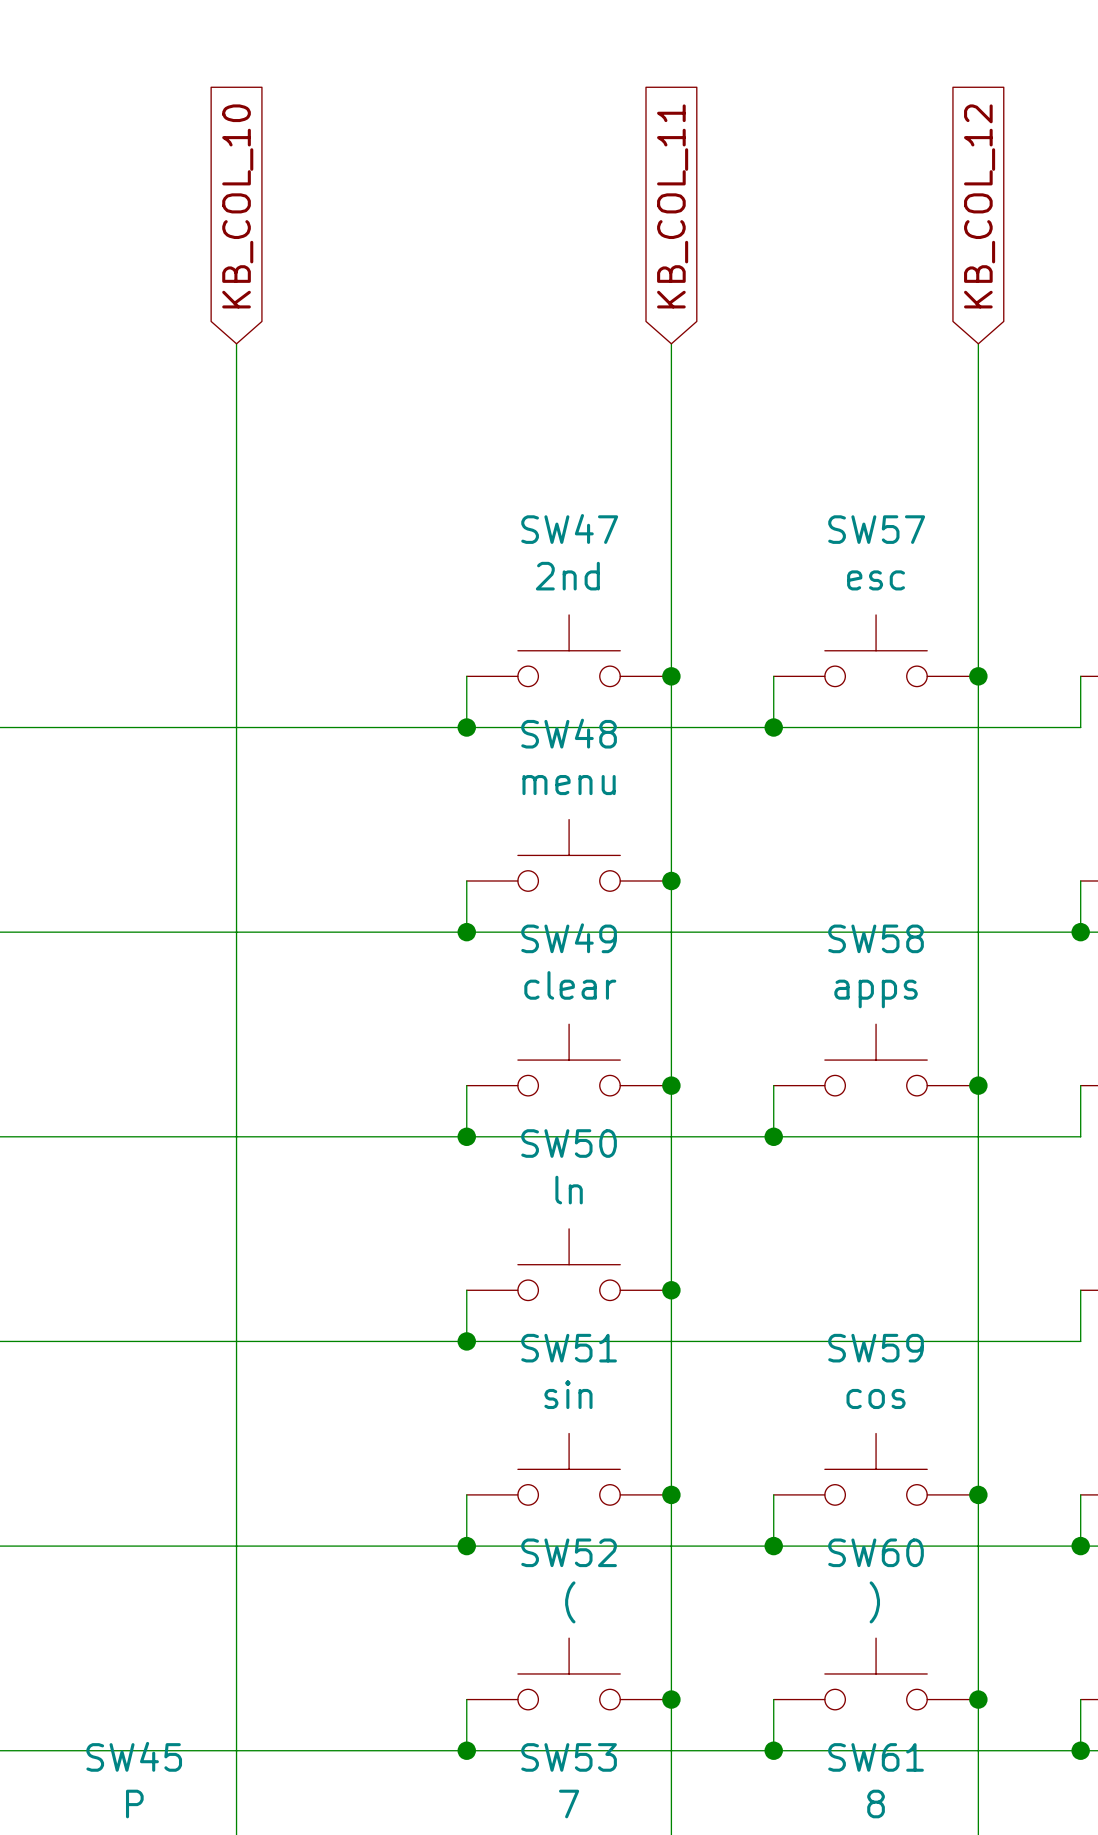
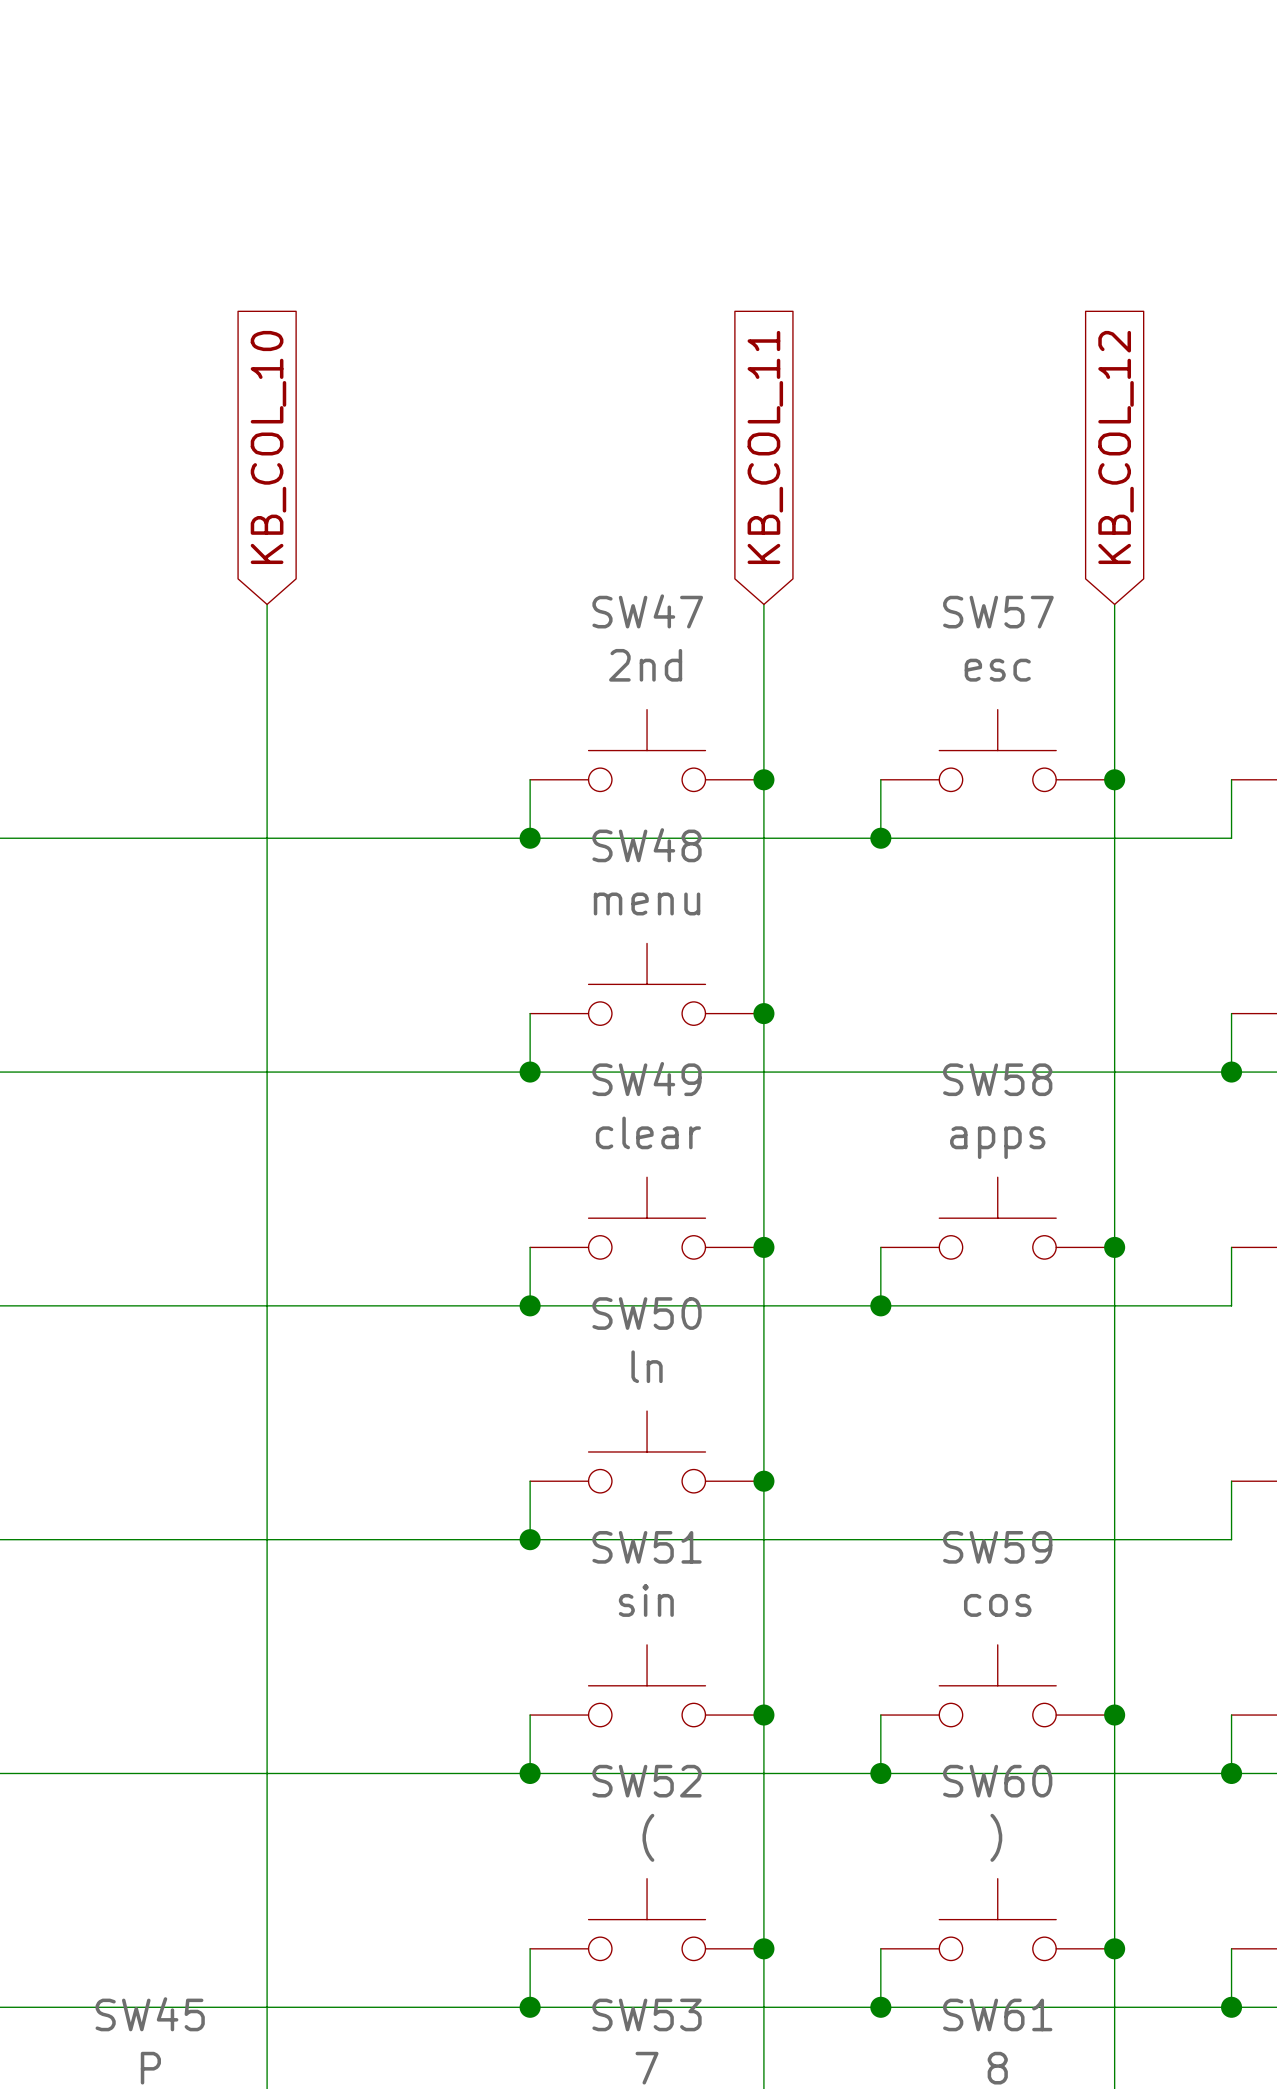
global label position: KB_COL_10 (237, 206) -> KB_COL_10 (268, 447)
global label position: KB_COL_11 (672, 206) -> KB_COL_11 (765, 447)
global label position: KB_COL_12 (979, 206) -> KB_COL_12 (1116, 447)
wire: (236, 343) (236, 522) -> none
wire: (671, 343) (671, 522) -> none
wire: (978, 343) (978, 522) -> none

